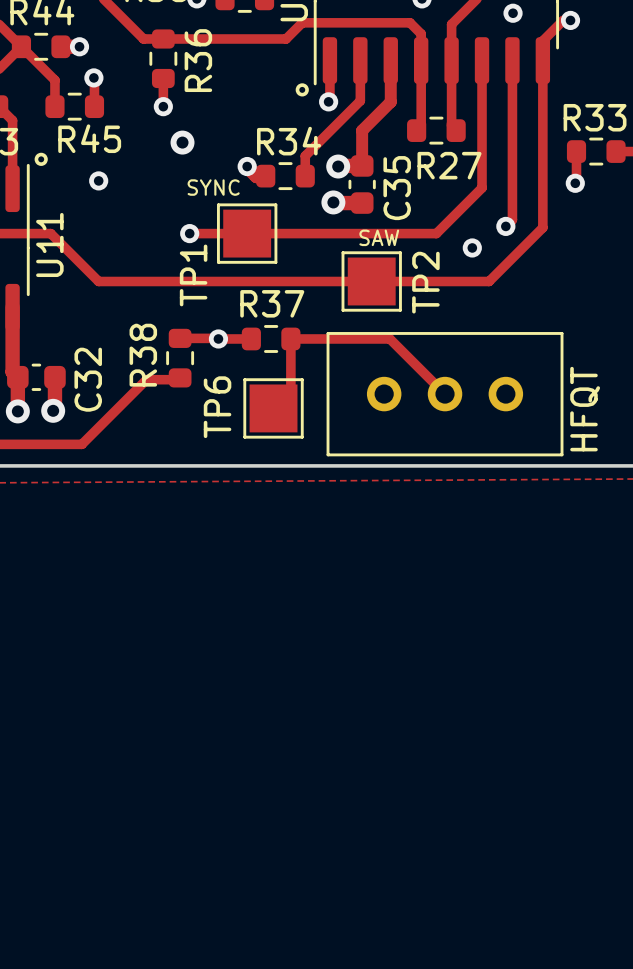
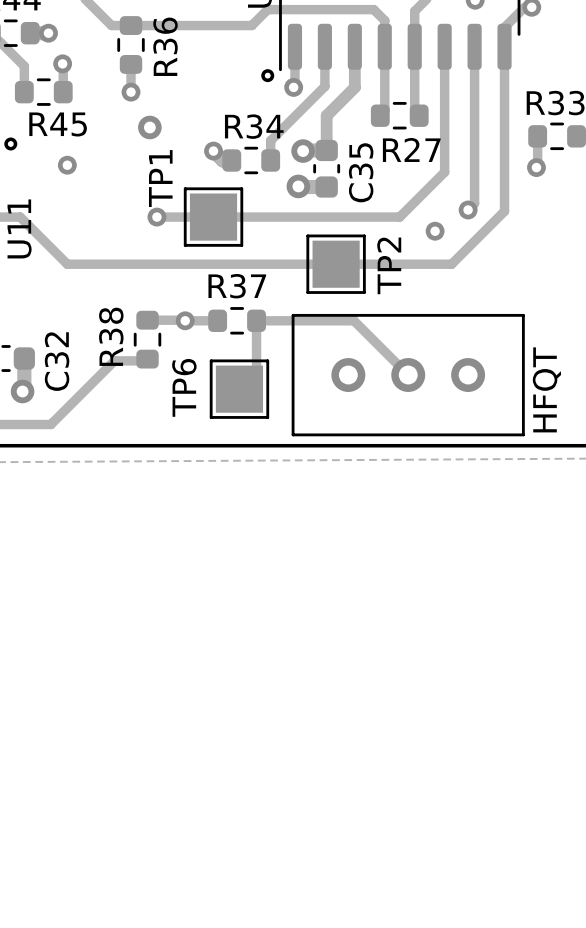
text: SYNC (213, 187) -> none
text: SAW (379, 237) -> none
TP1 name position: TP1 (193, 275) -> TP1 (160, 178)

